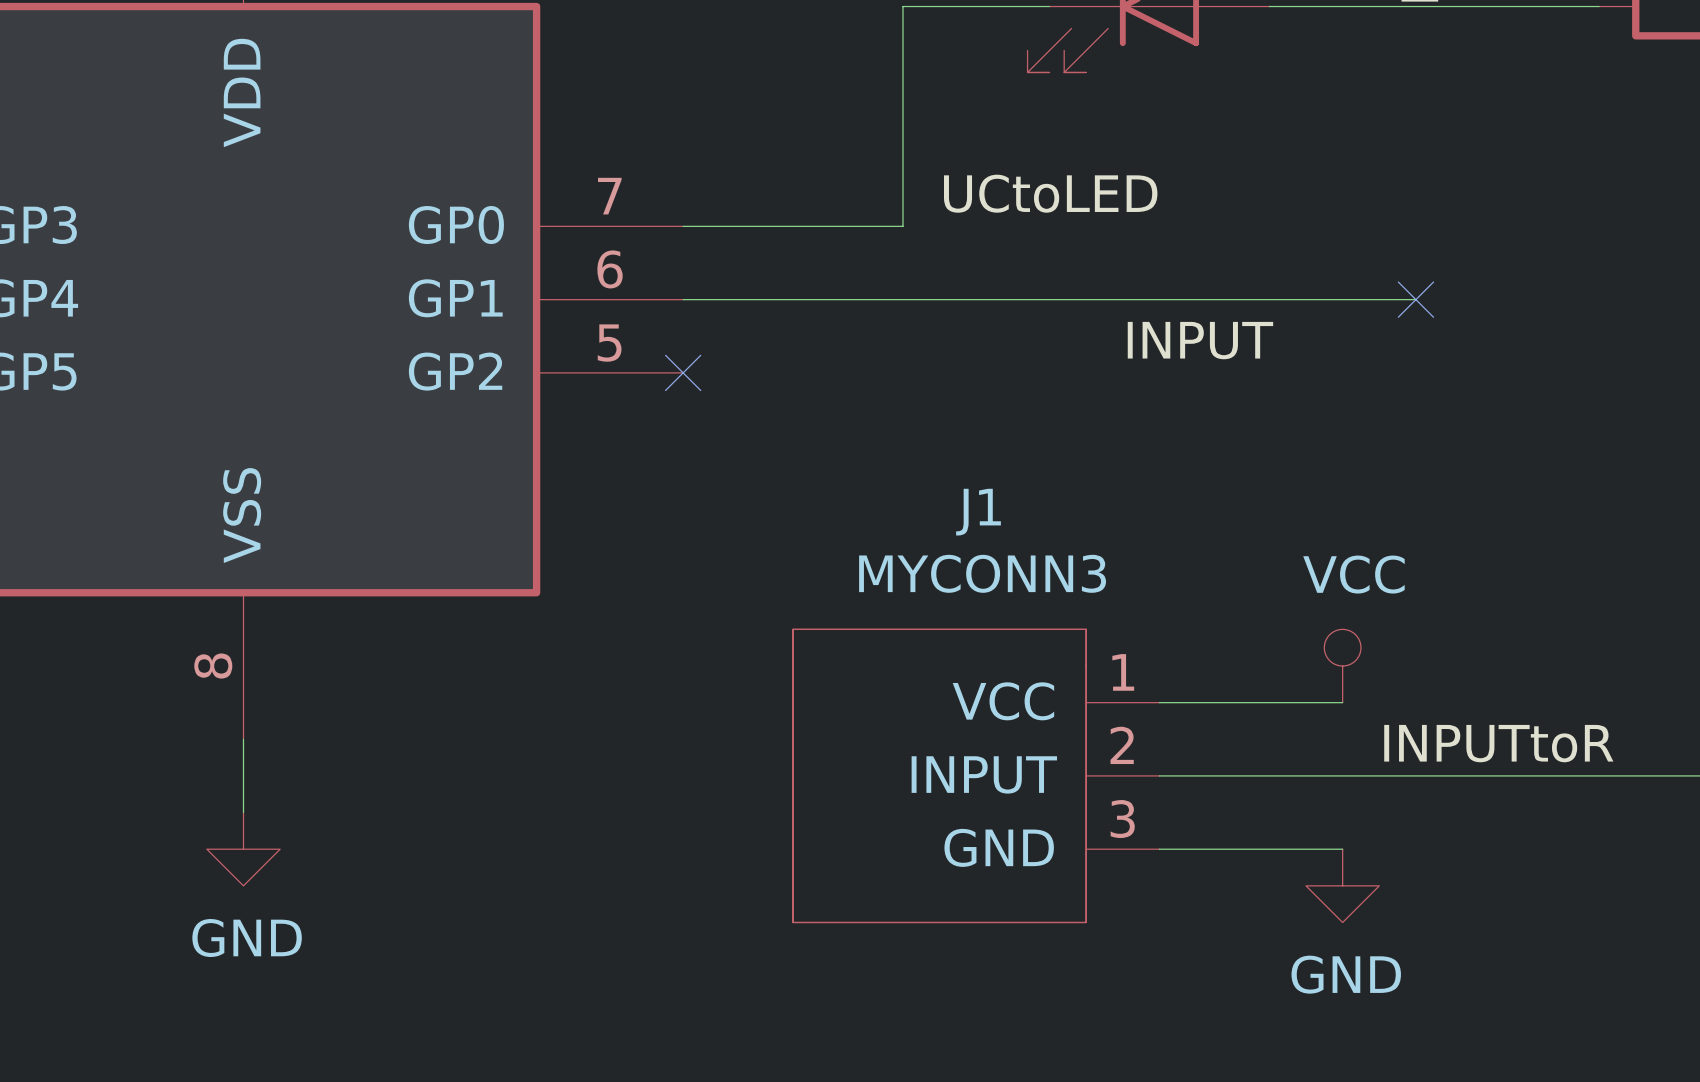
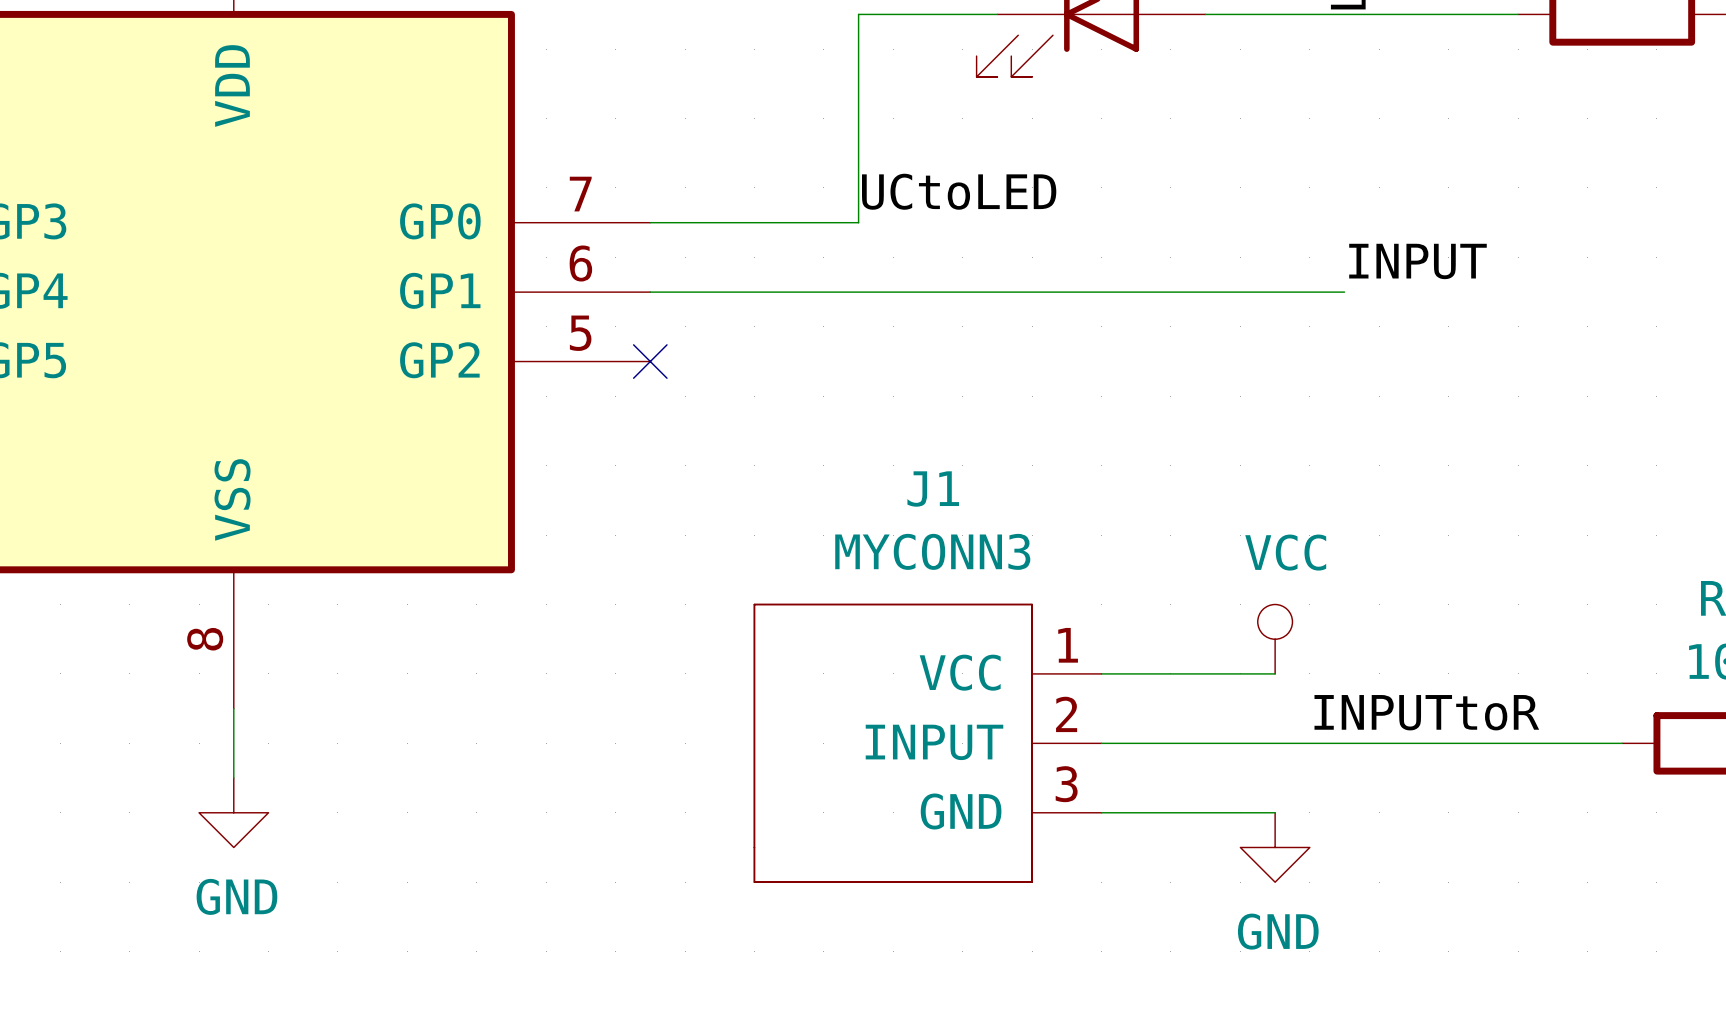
label position: UCtoLED (1050, 193) -> UCtoLED (959, 191)
no-connect mark: (1415, 299) -> none
label position: INPUT (1200, 340) -> INPUT (1417, 261)

